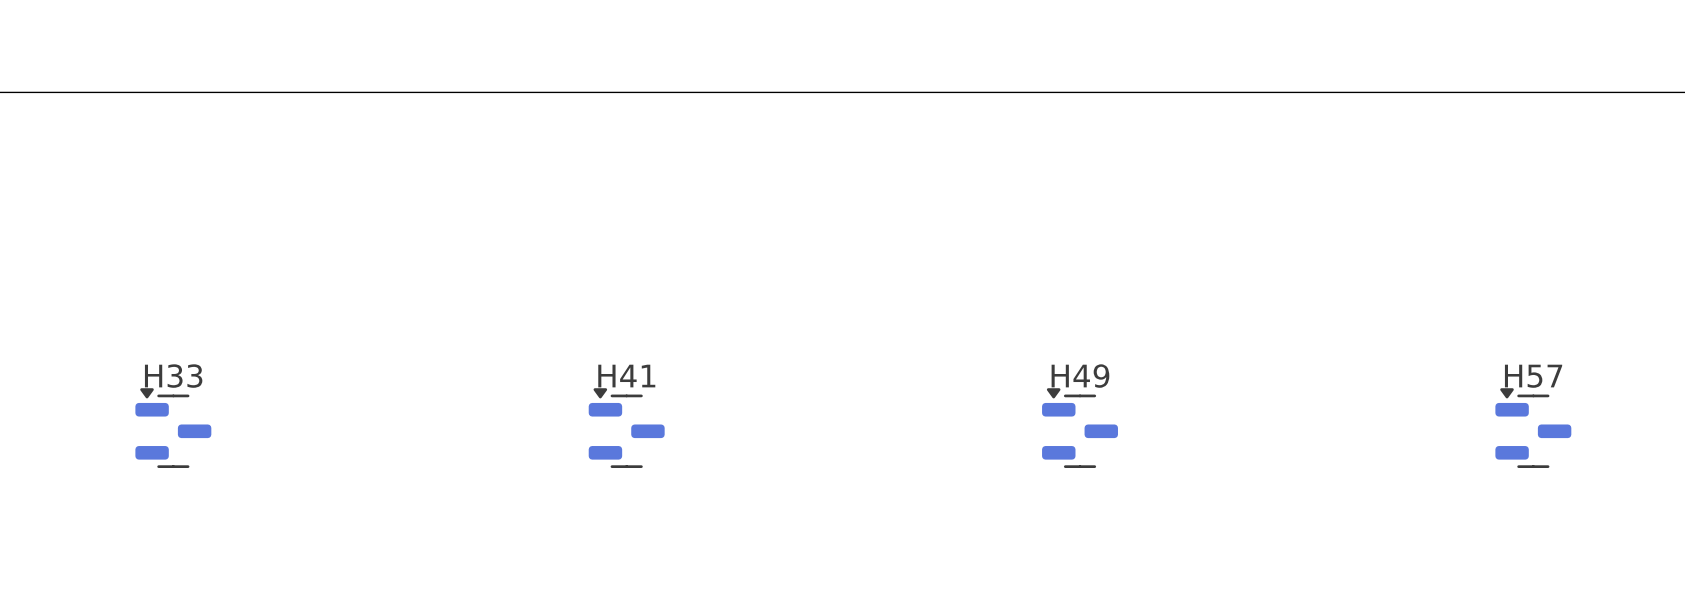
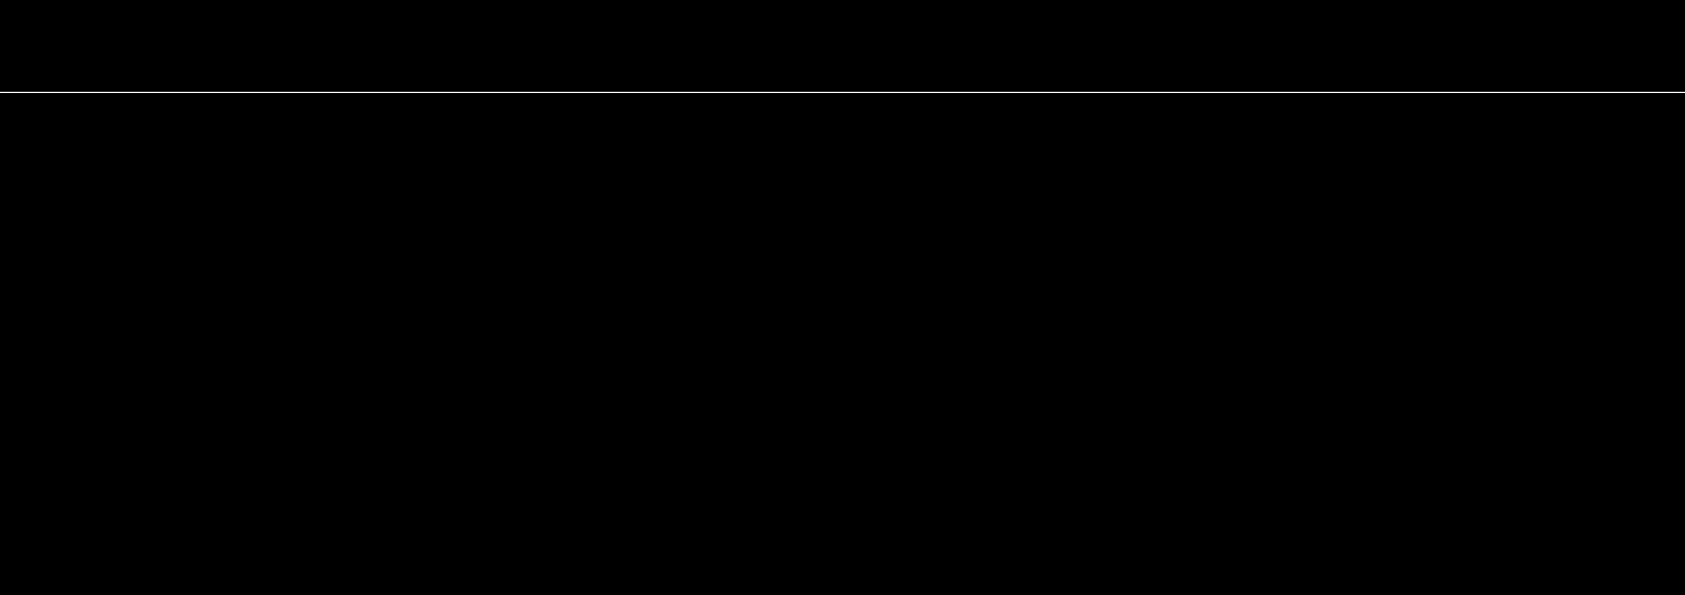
H33: (173, 428) -> none
H41: (626, 428) -> none
H49: (1080, 428) -> none
H57: (1533, 428) -> none

